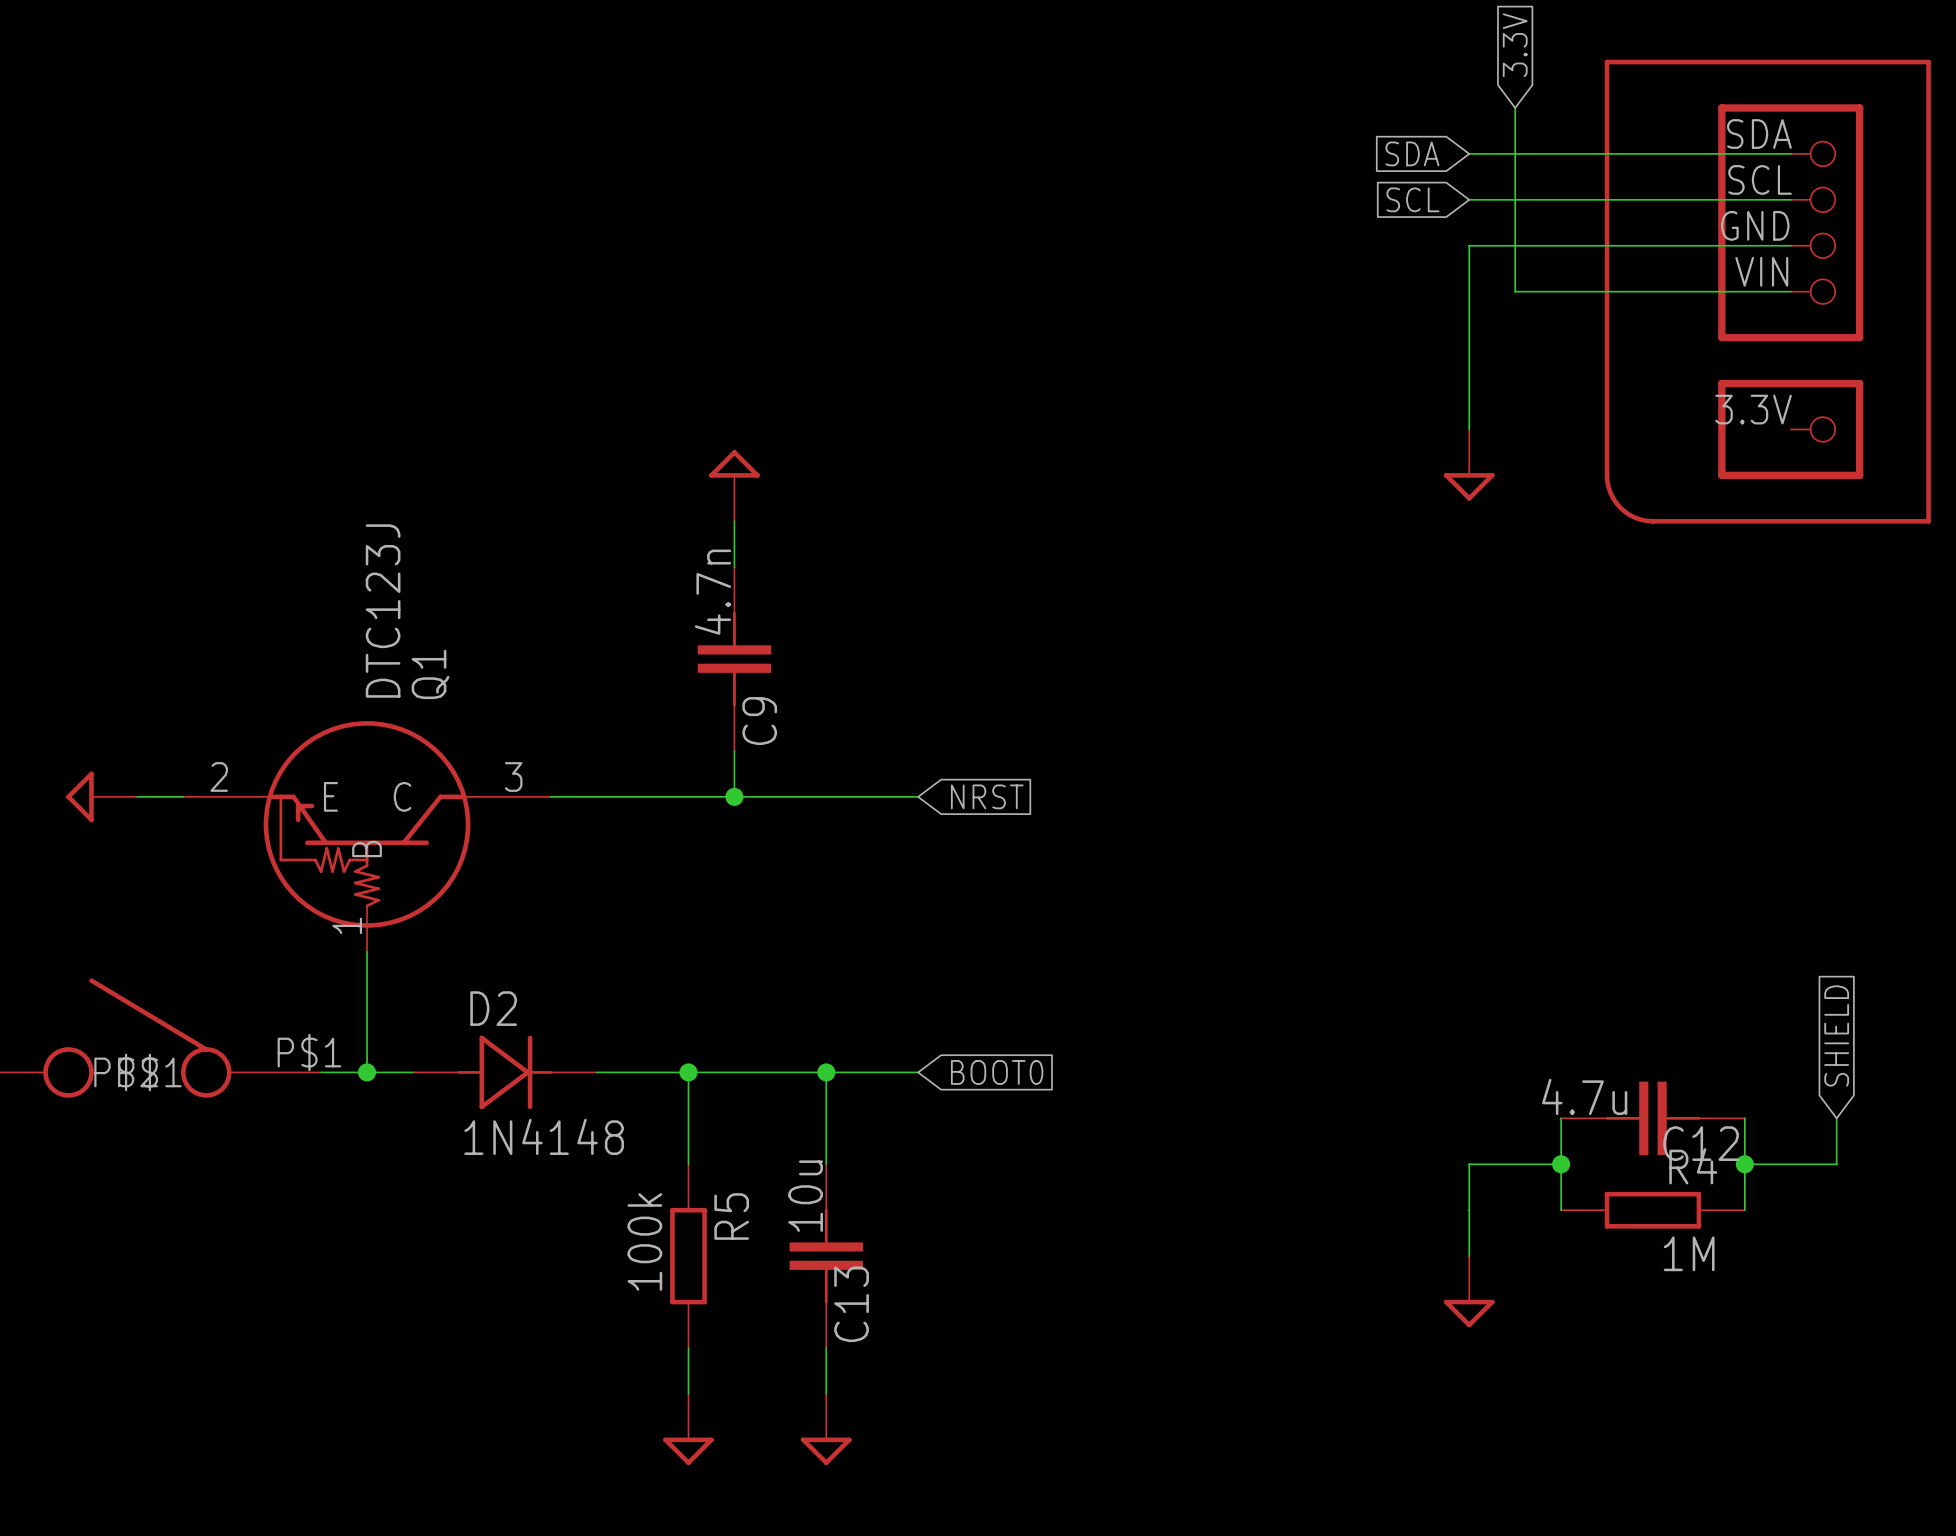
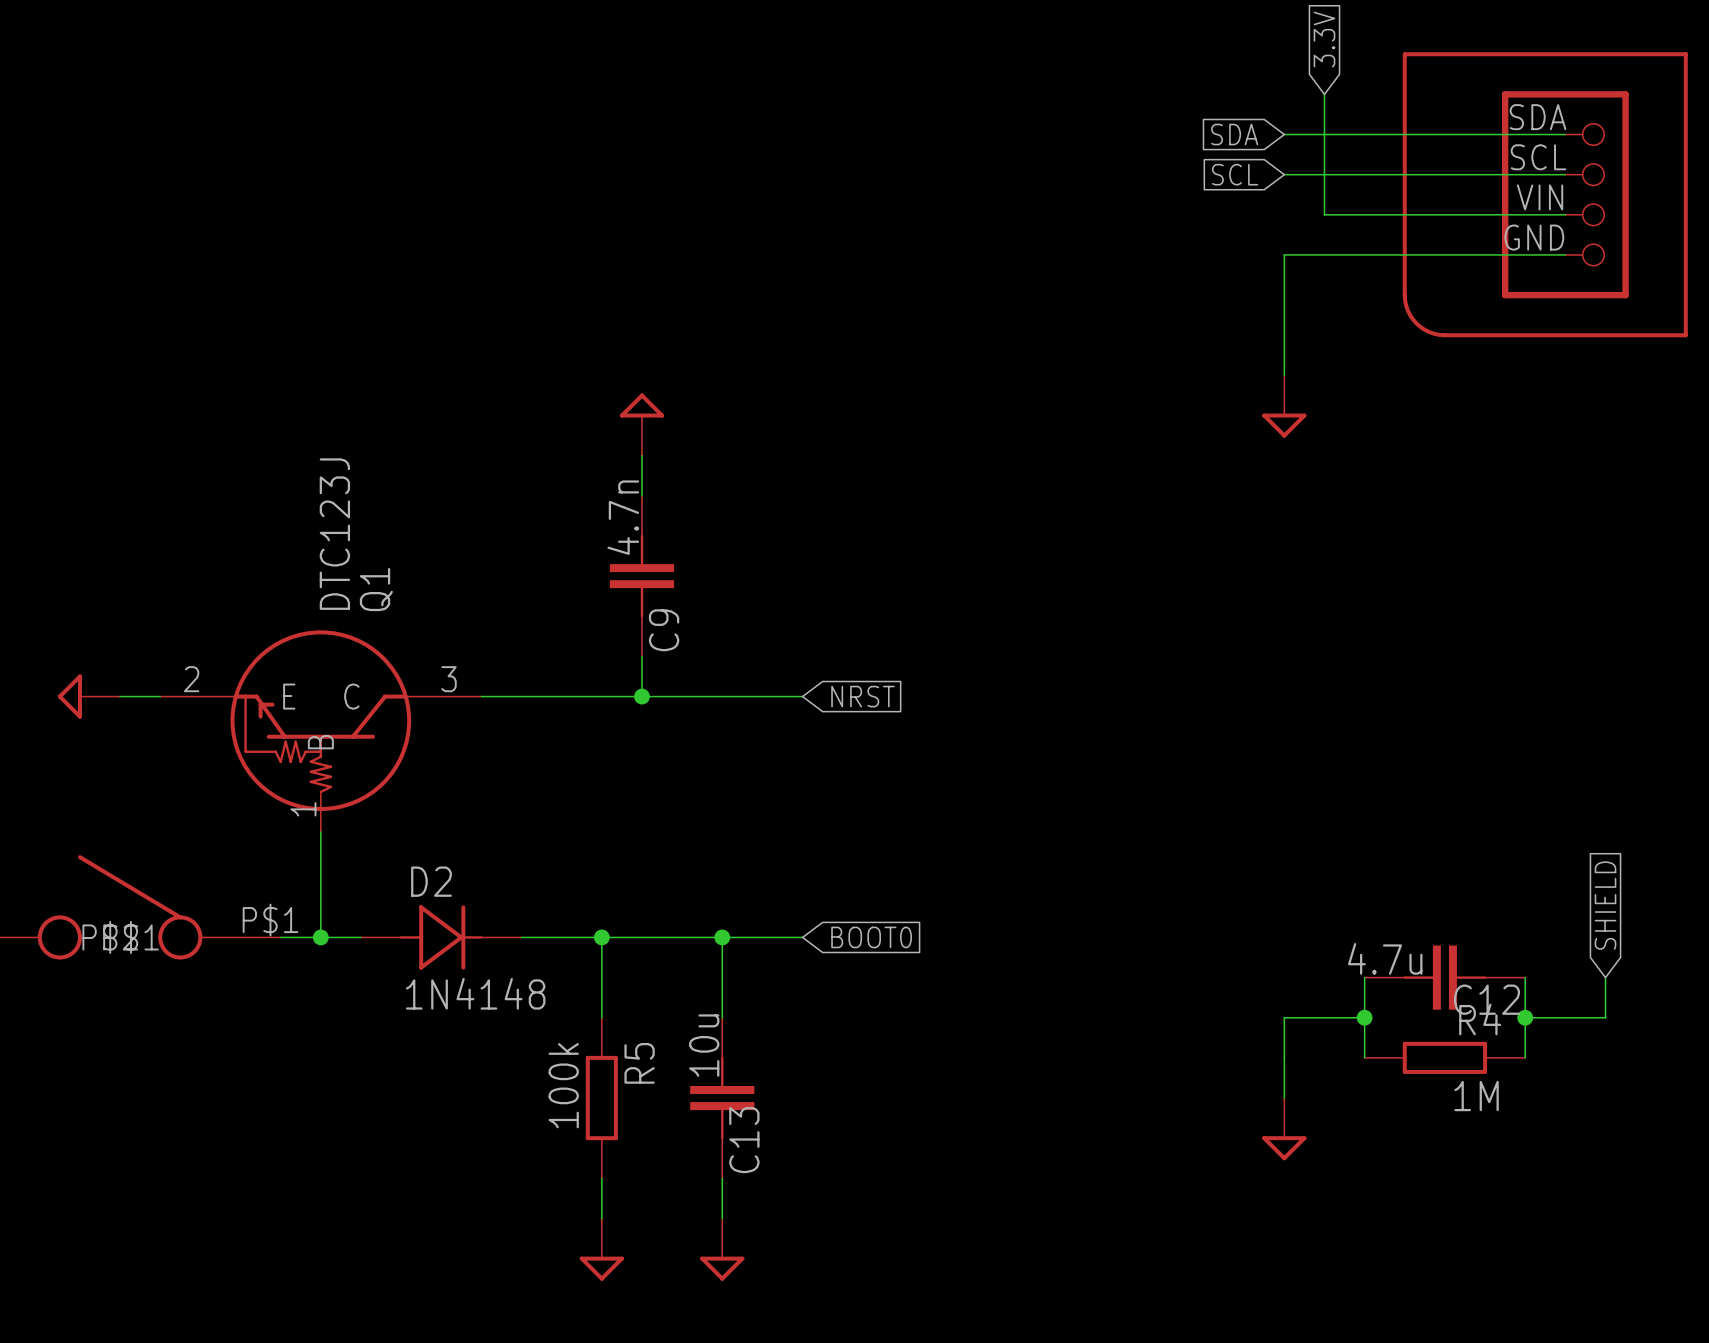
part: none -> (1545, 194)
wire: (1469, 291) (1469, 245) (1515, 245) (1515, 291) -> (1284, 254) (1324, 254)
part: (1767, 291) -> none

